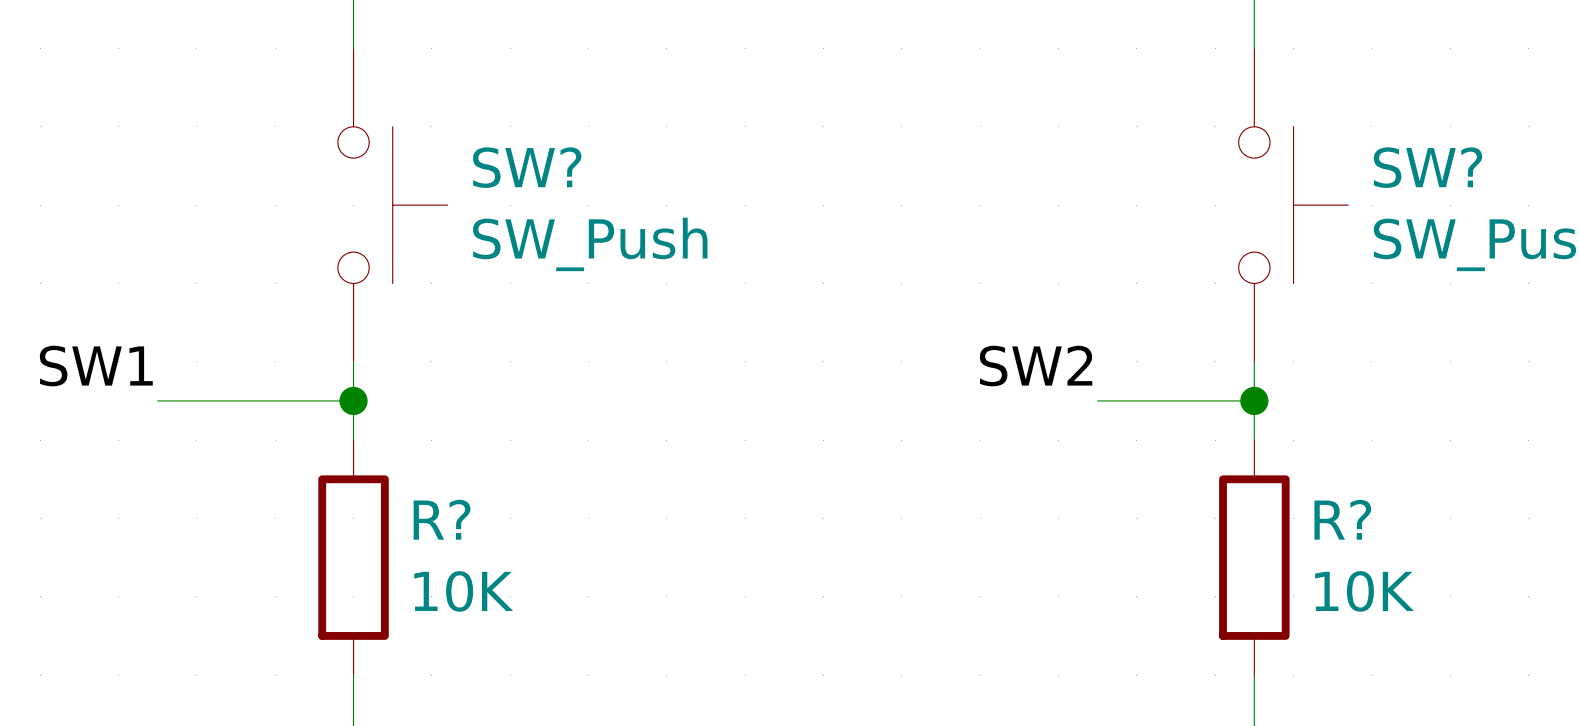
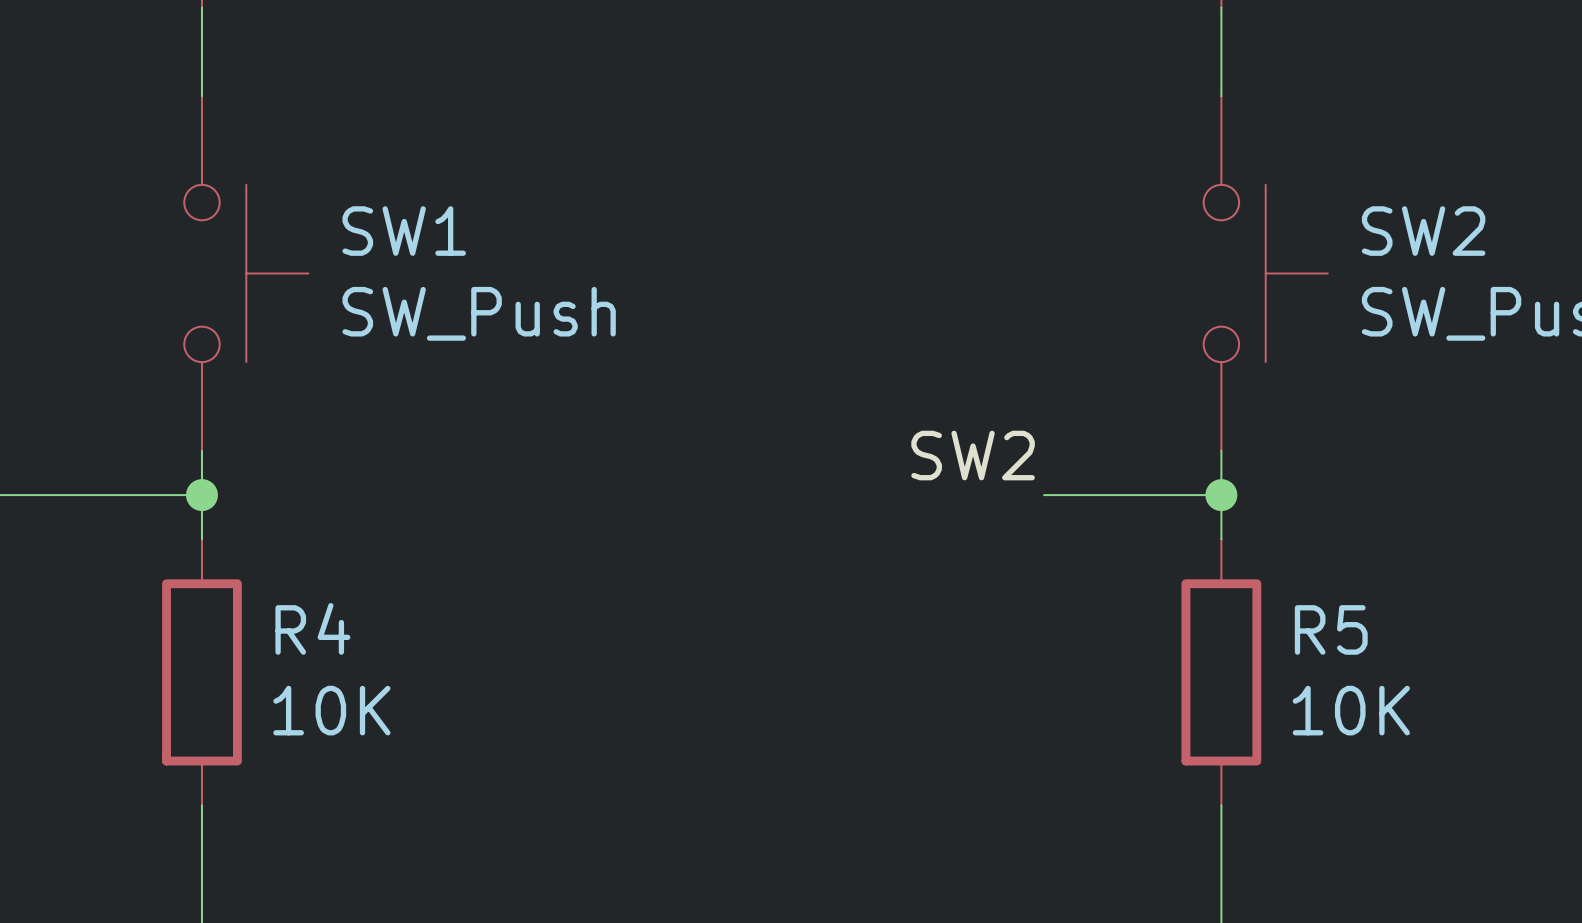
SW? name: SW? (527, 167) -> SW1 (404, 231)
SW? name: SW? (1428, 167) -> SW2 (1423, 231)
R? name: R? (442, 519) -> R4 (312, 628)
R? name: R? (1342, 519) -> R5 (1331, 629)

